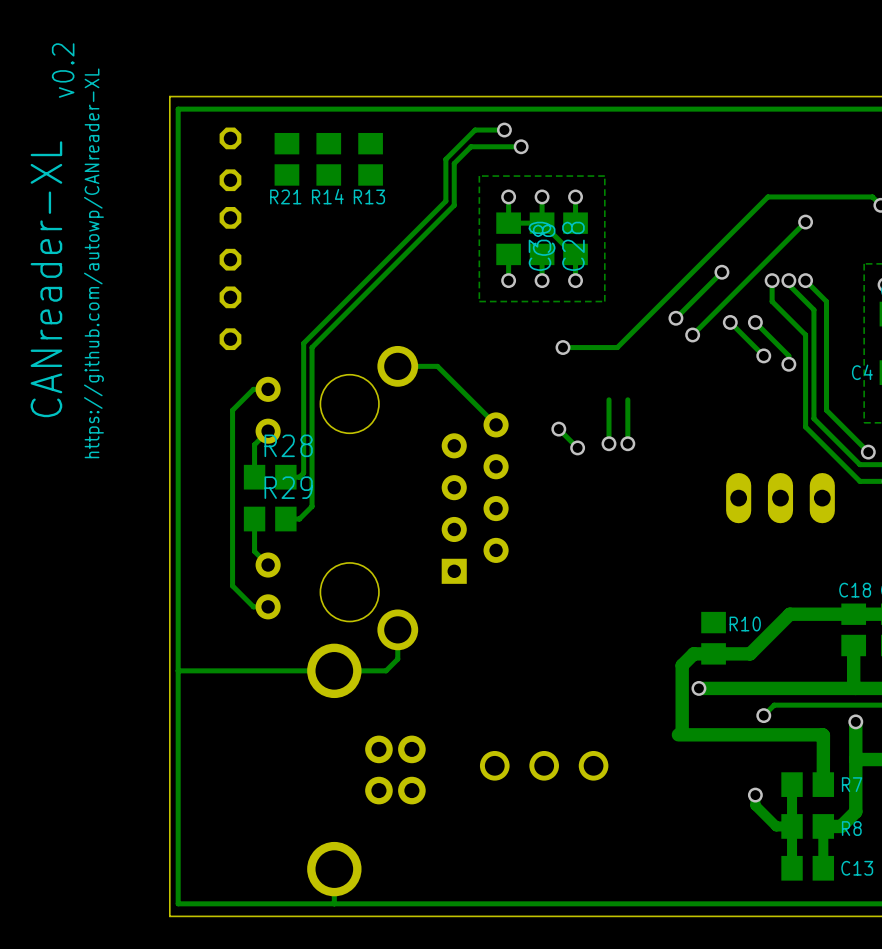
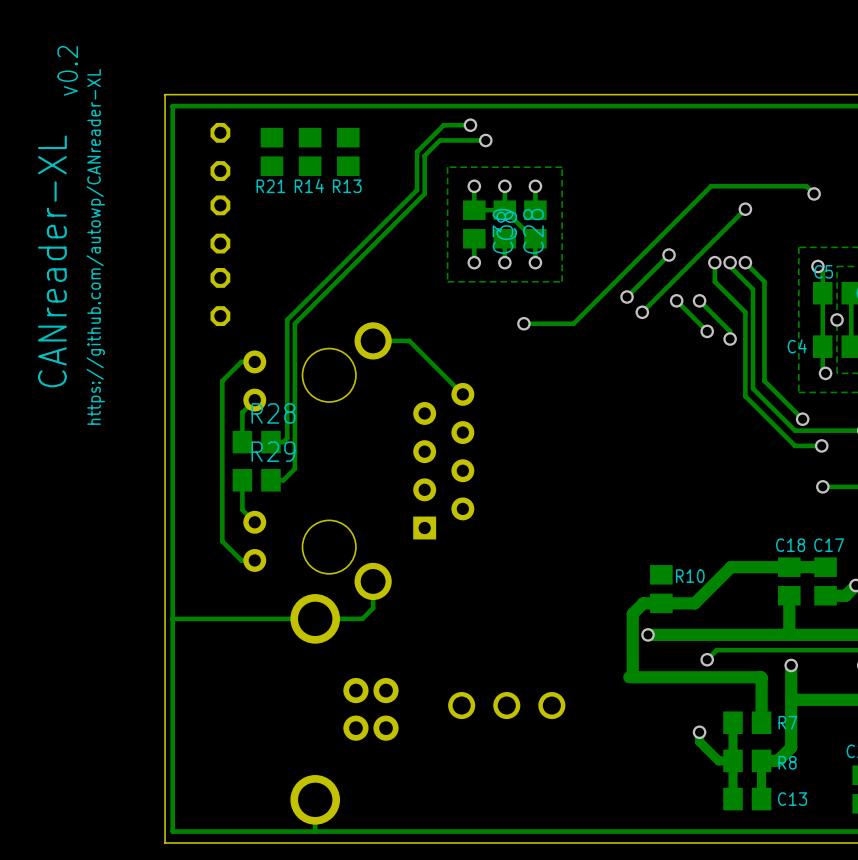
track: (609, 399) (609, 443) -> none
track: (627, 399) (627, 443) -> none
track: (558, 429) (577, 447) -> none
via: (558, 429) -> none
via: (609, 443) -> none
via: (627, 443) -> none
via: (577, 447) -> none
part: (780, 498) -> none

